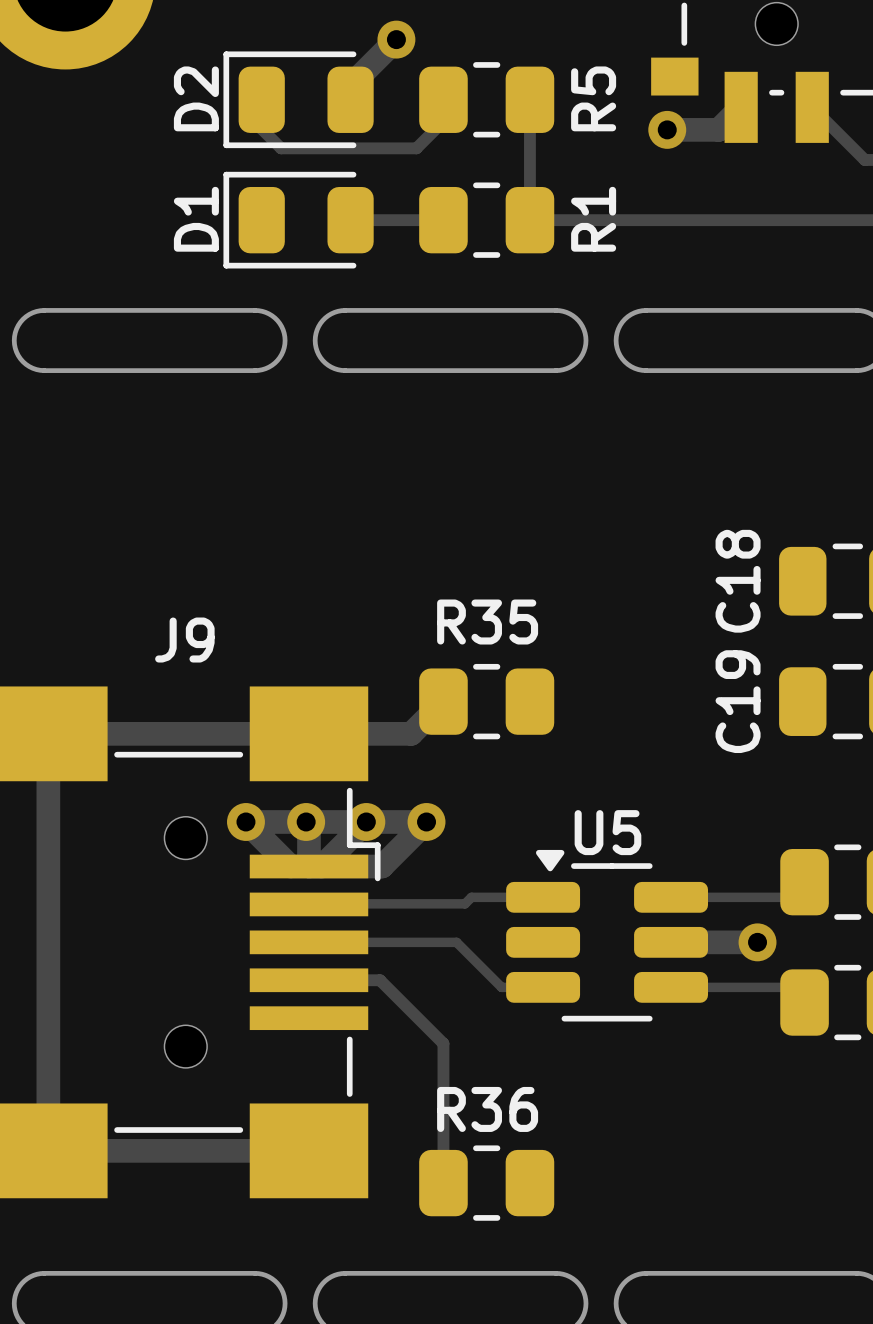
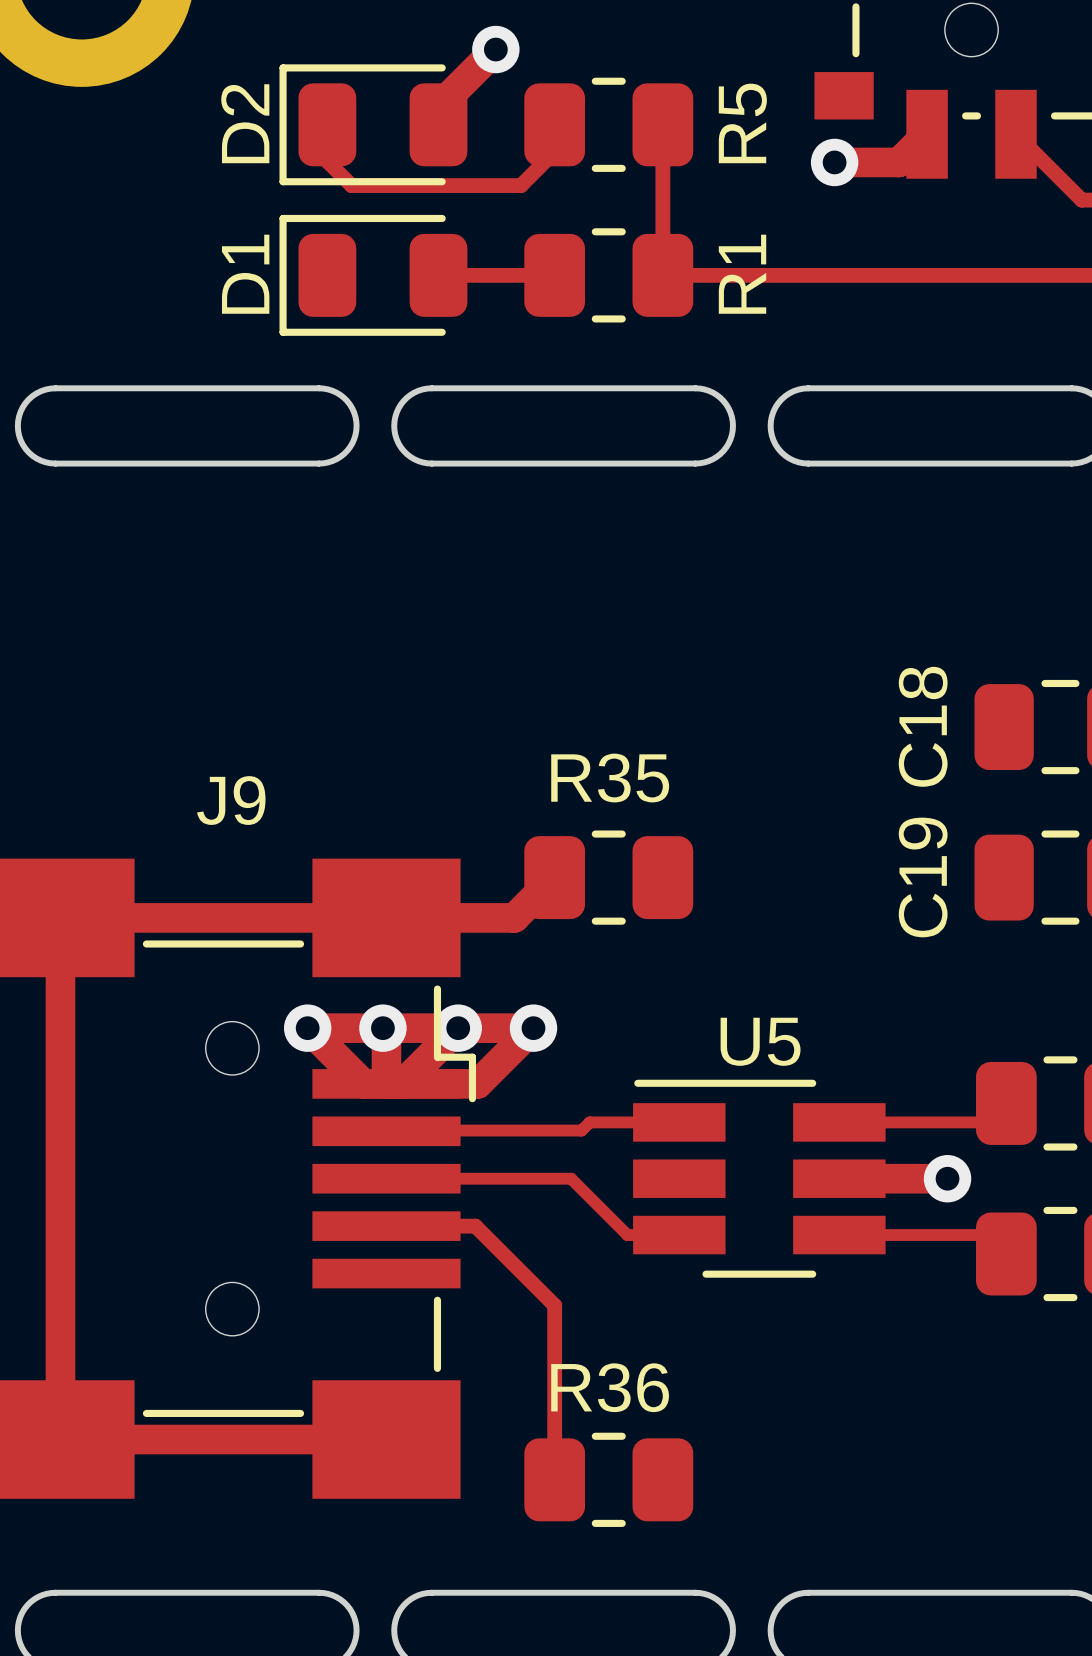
U5 footprint: [506, 849, 709, 1022] -> [633, 1079, 886, 1278]

